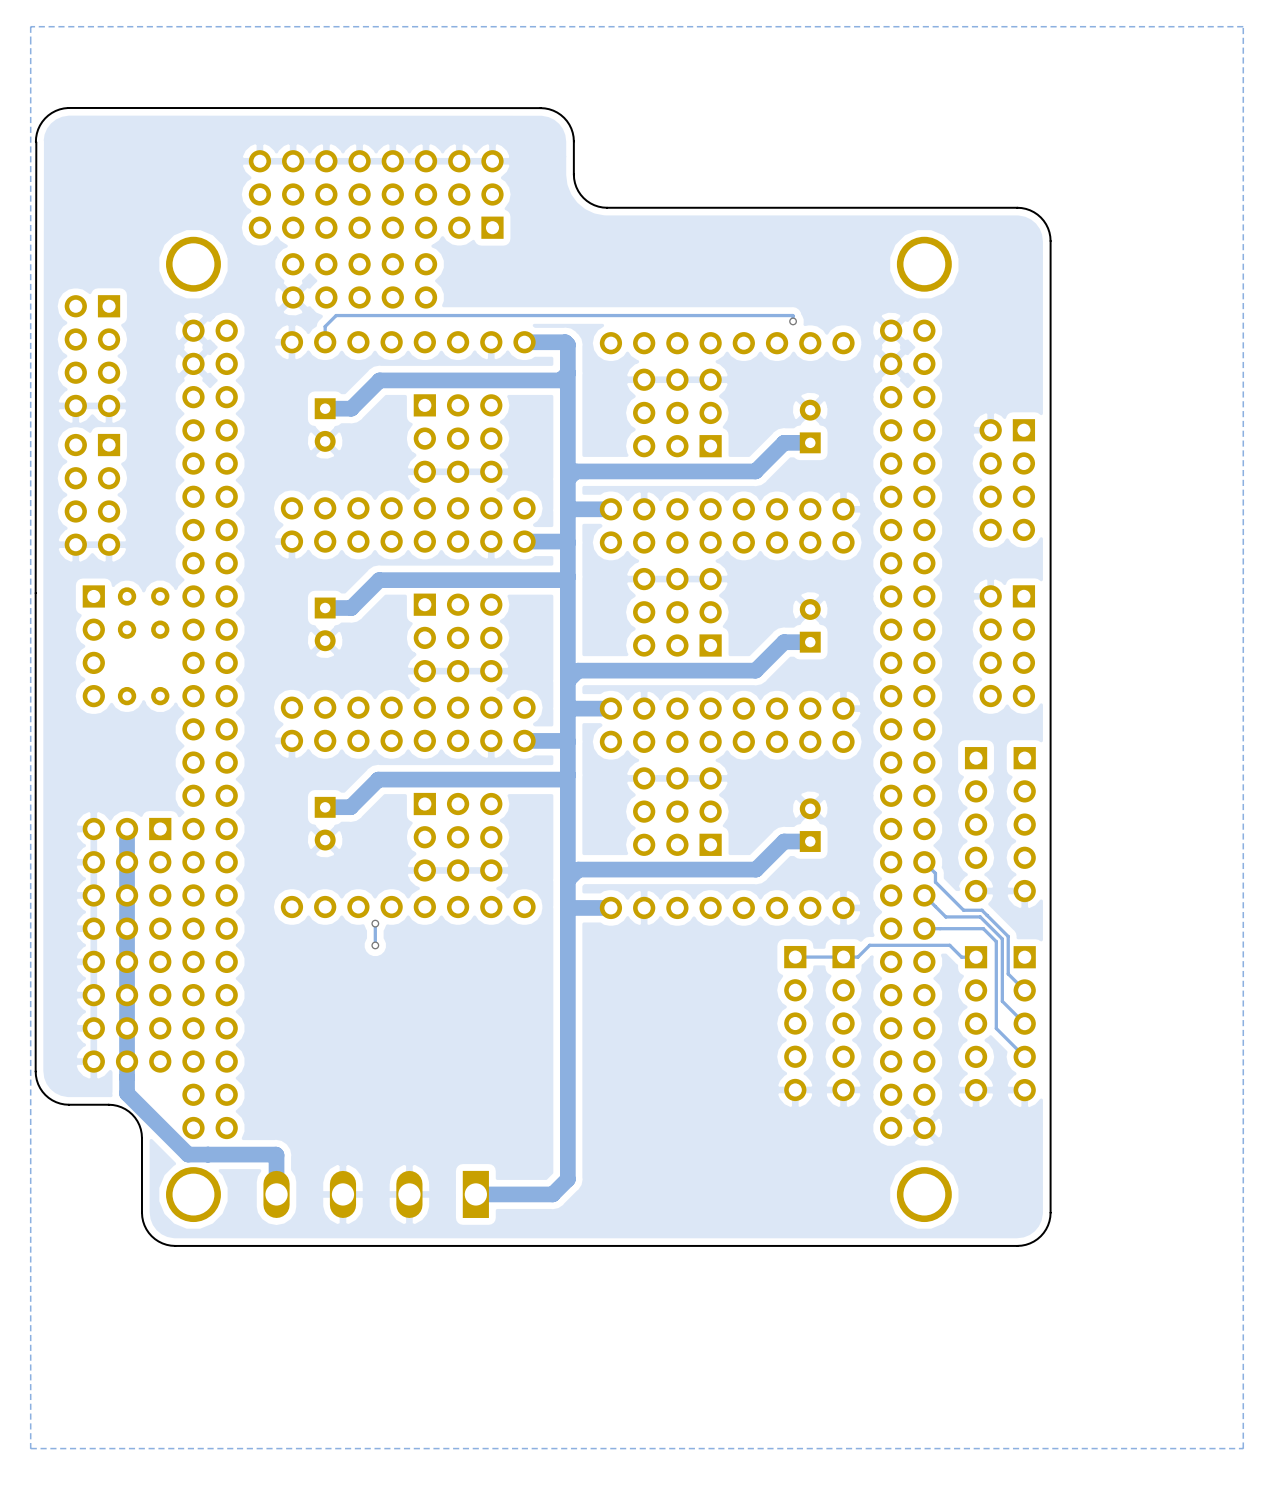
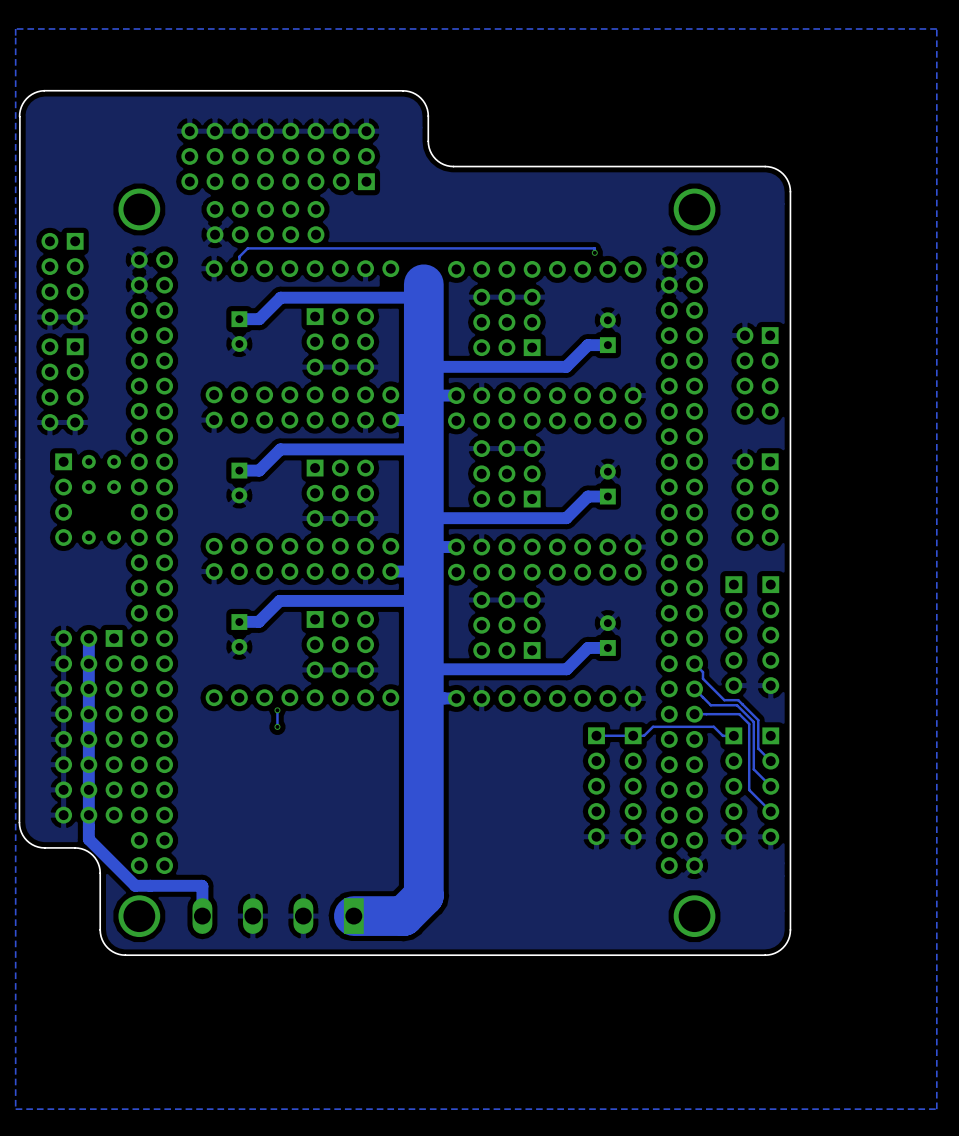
track: (524, 342) (565, 342) (567, 344) (567, 1179) (552, 1194) (541, 1194) -> (423, 284) (423, 895) (403, 916)
track width: thin (541, 1194) (475, 1194) -> thick (403, 916) (353, 916)

